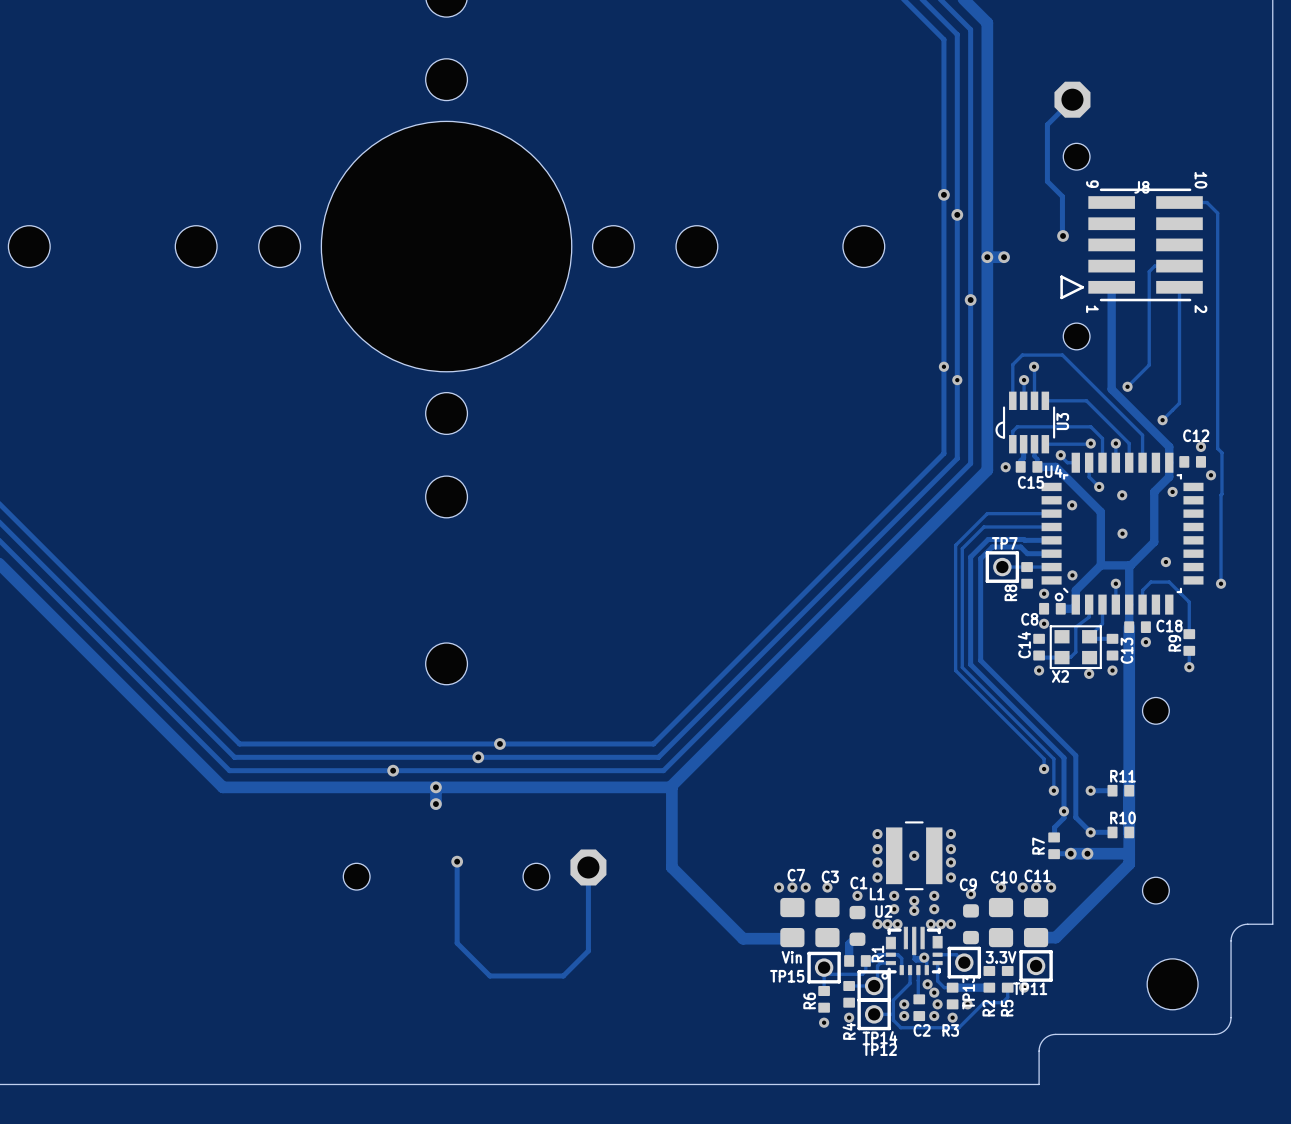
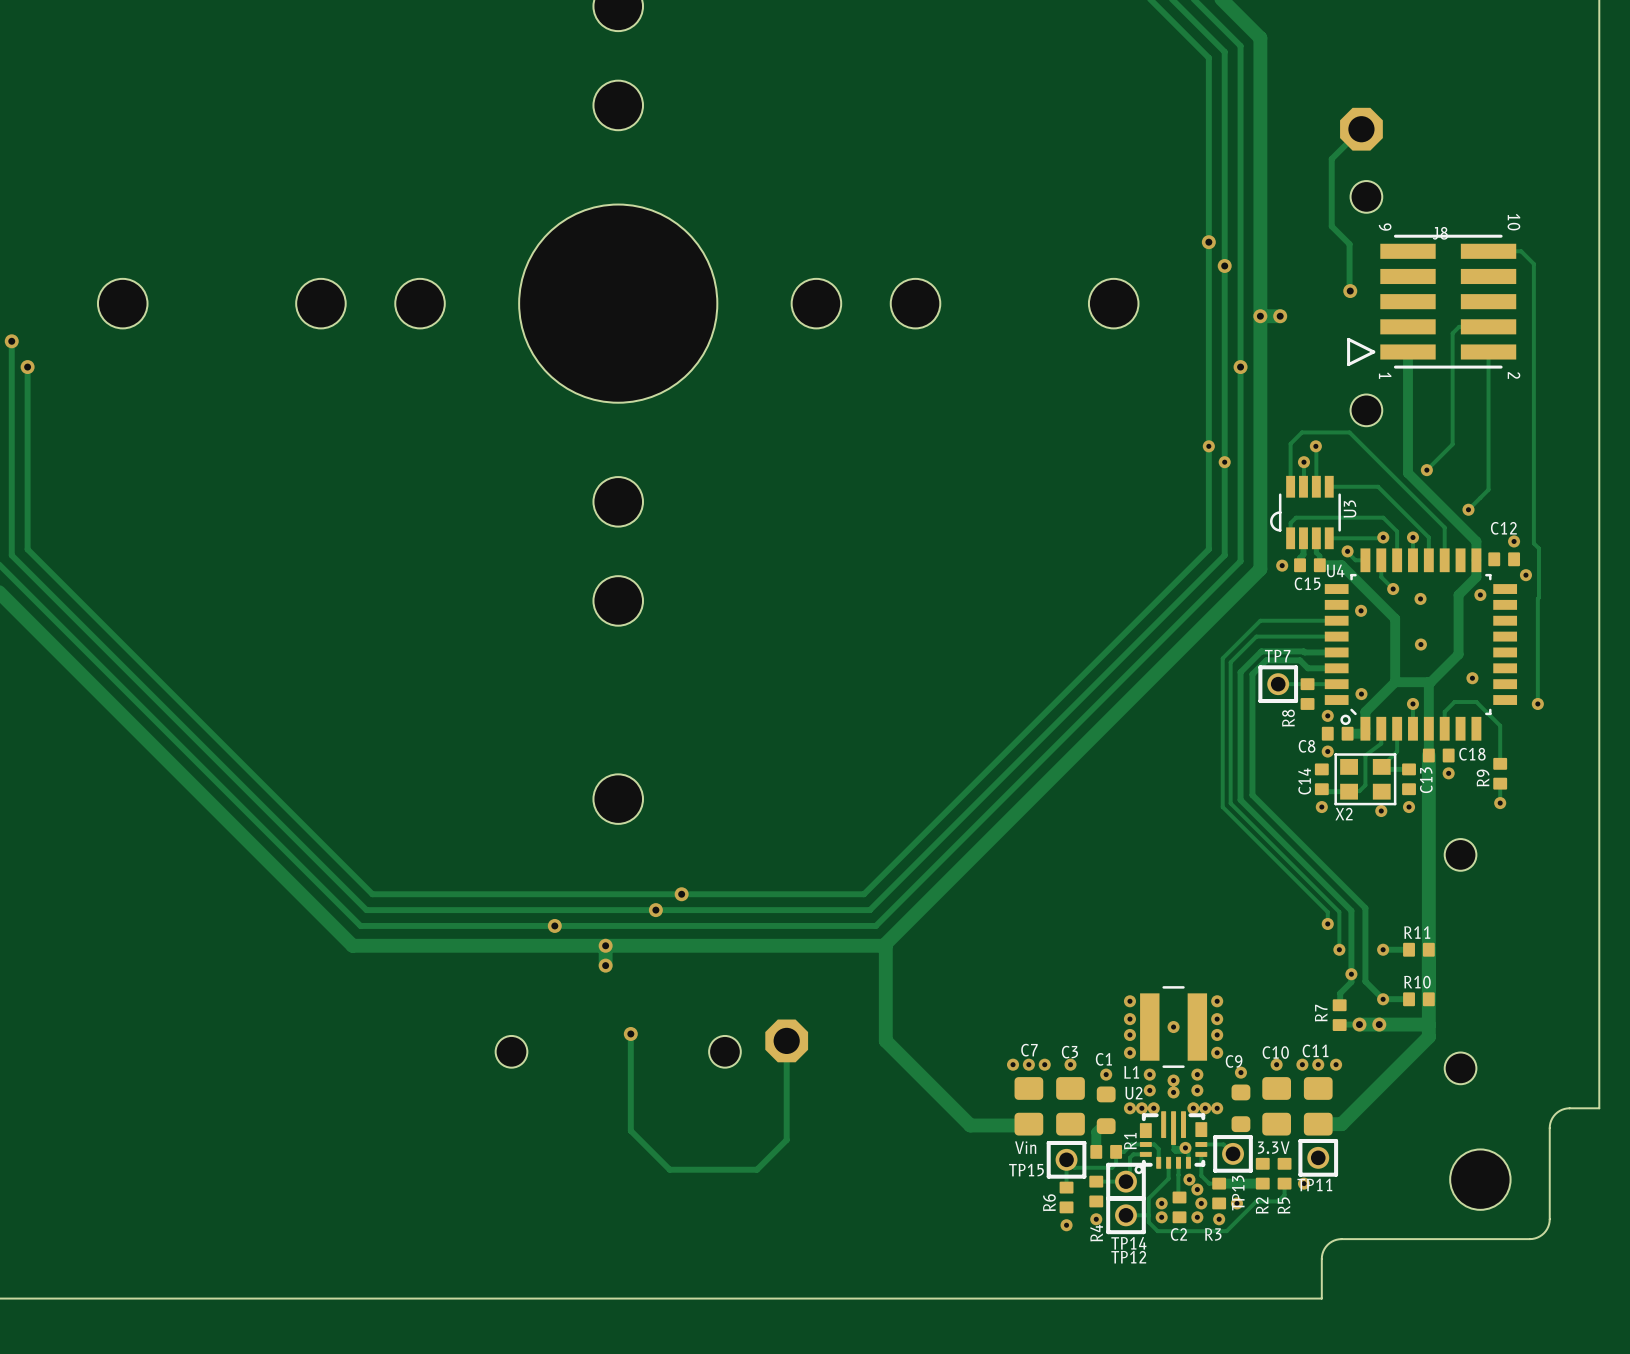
hole size: [321, 121, 572, 372] -> [519, 204, 718, 403]

